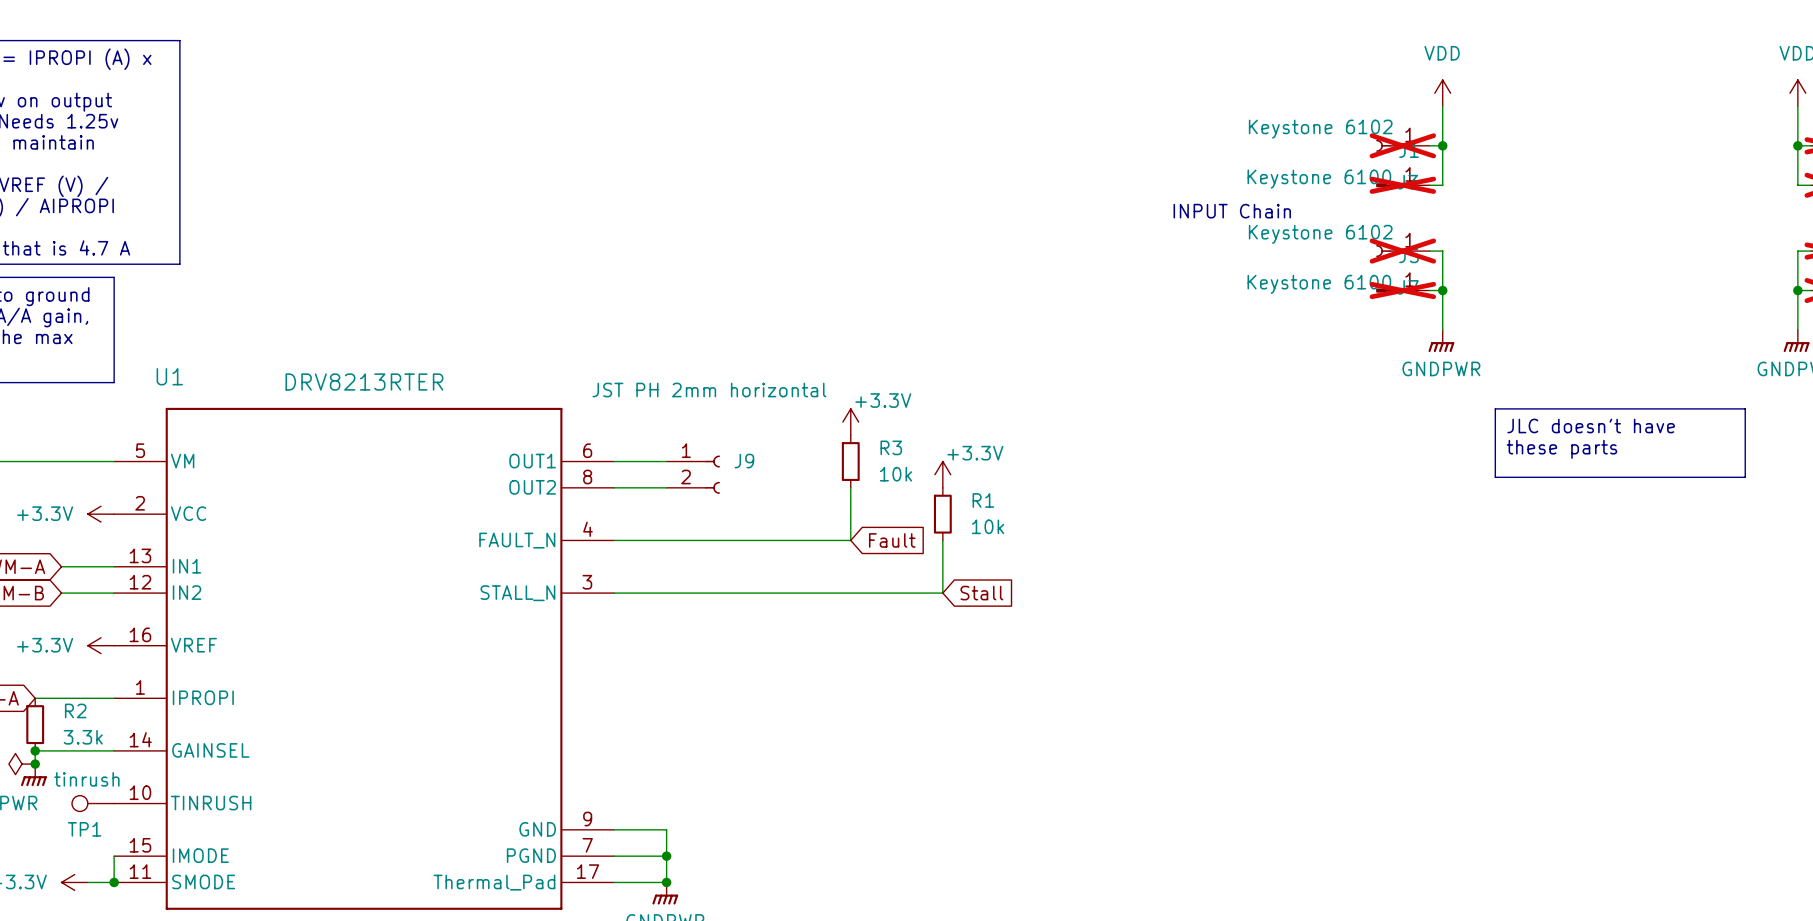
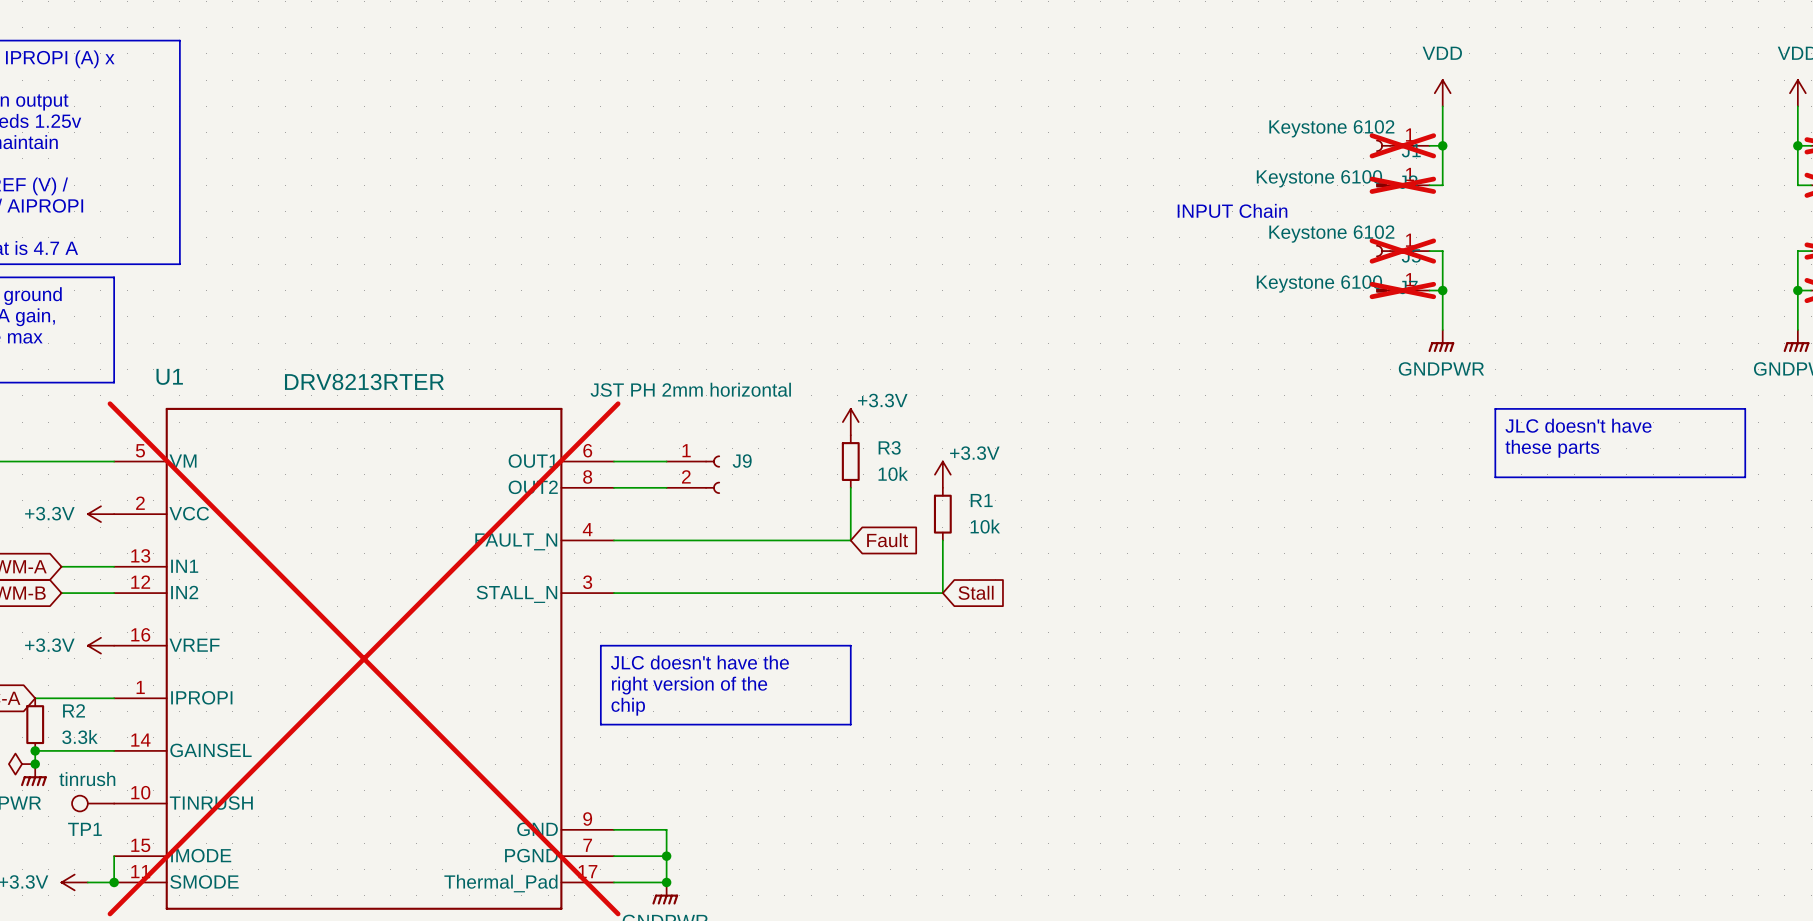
line: none -> (600, 645) (850, 645) (850, 724) (600, 724) (600, 645)
U1 do-not-place cross: none -> (364, 658)
text: none -> JLC doesn't have the (699, 662)
text: none -> right version of the (689, 685)
text: none -> chip (628, 706)

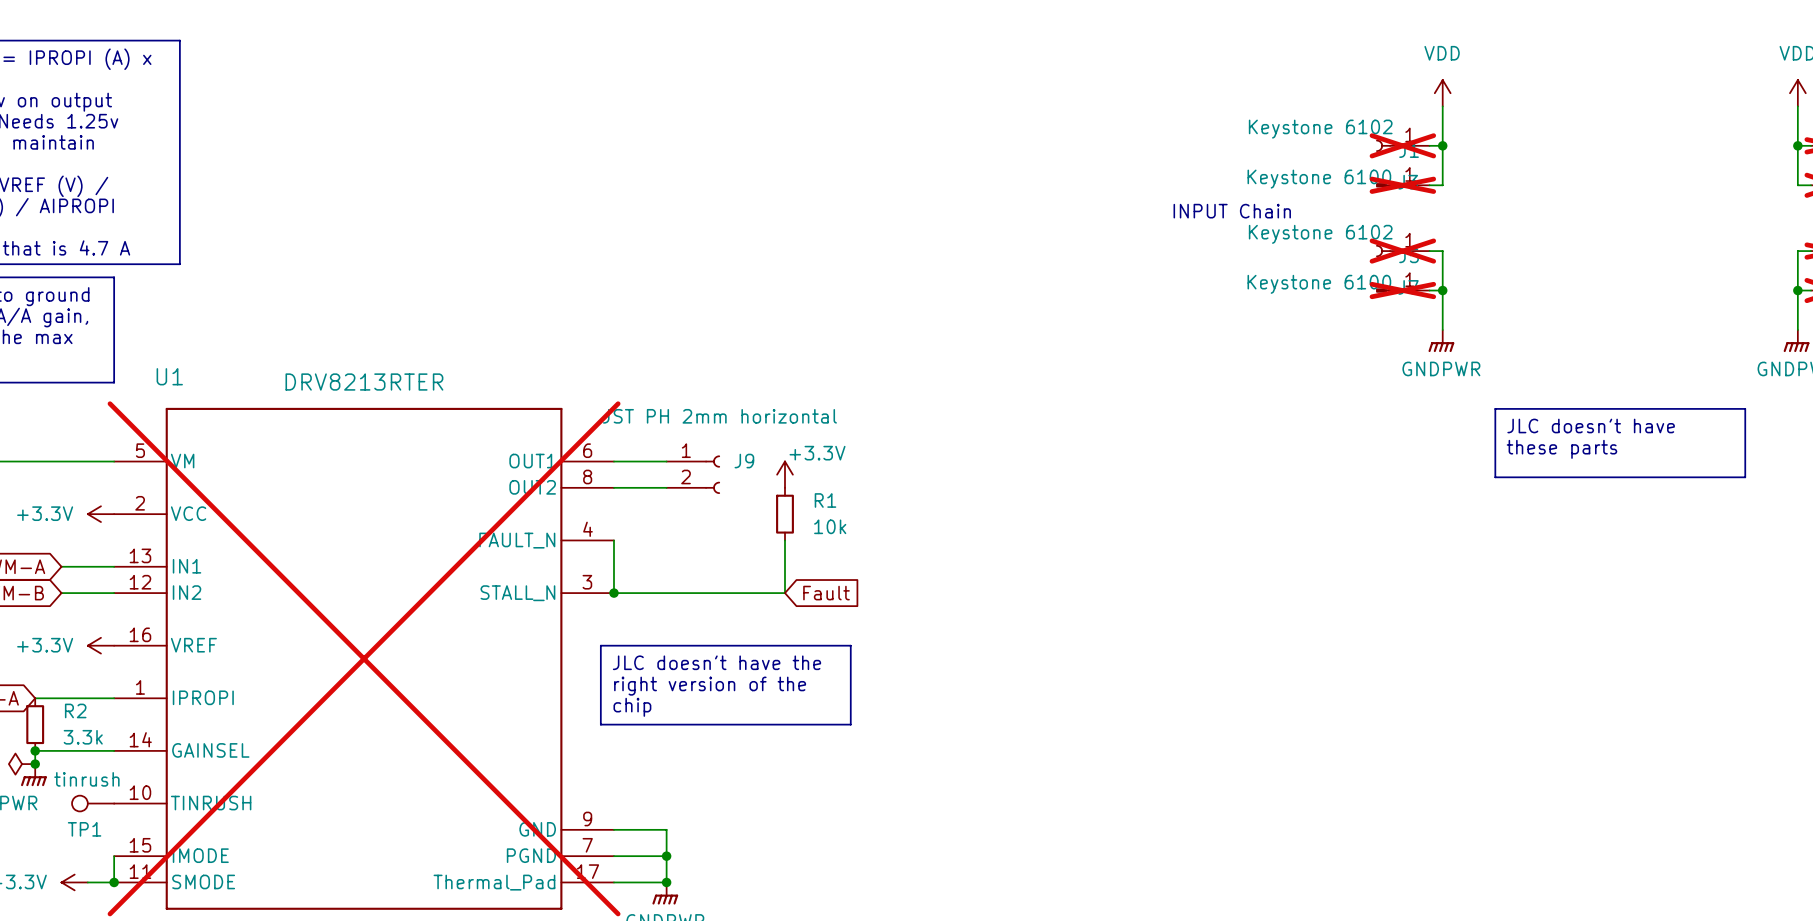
J9 value position: JST PH 2mm horizontal (690, 389) -> JST PH 2mm horizontal (719, 416)
power symbol: +3.3V (850, 422) -> none
R3: 10k (850, 461) -> none
power symbol: none -> +3.3V (784, 474)
power symbol: +3.3V (942, 474) -> none
wire: (850, 487) (850, 540) (613, 540) -> (613, 593) (613, 540)
R1 position: (942, 514) -> (784, 514)
global label position: Fault (887, 540) -> Fault (826, 593)
wire: (942, 540) (942, 593) (784, 593) -> (784, 540) (784, 593)
global label: Stall (976, 592) -> none
junction: none -> (613, 593)

